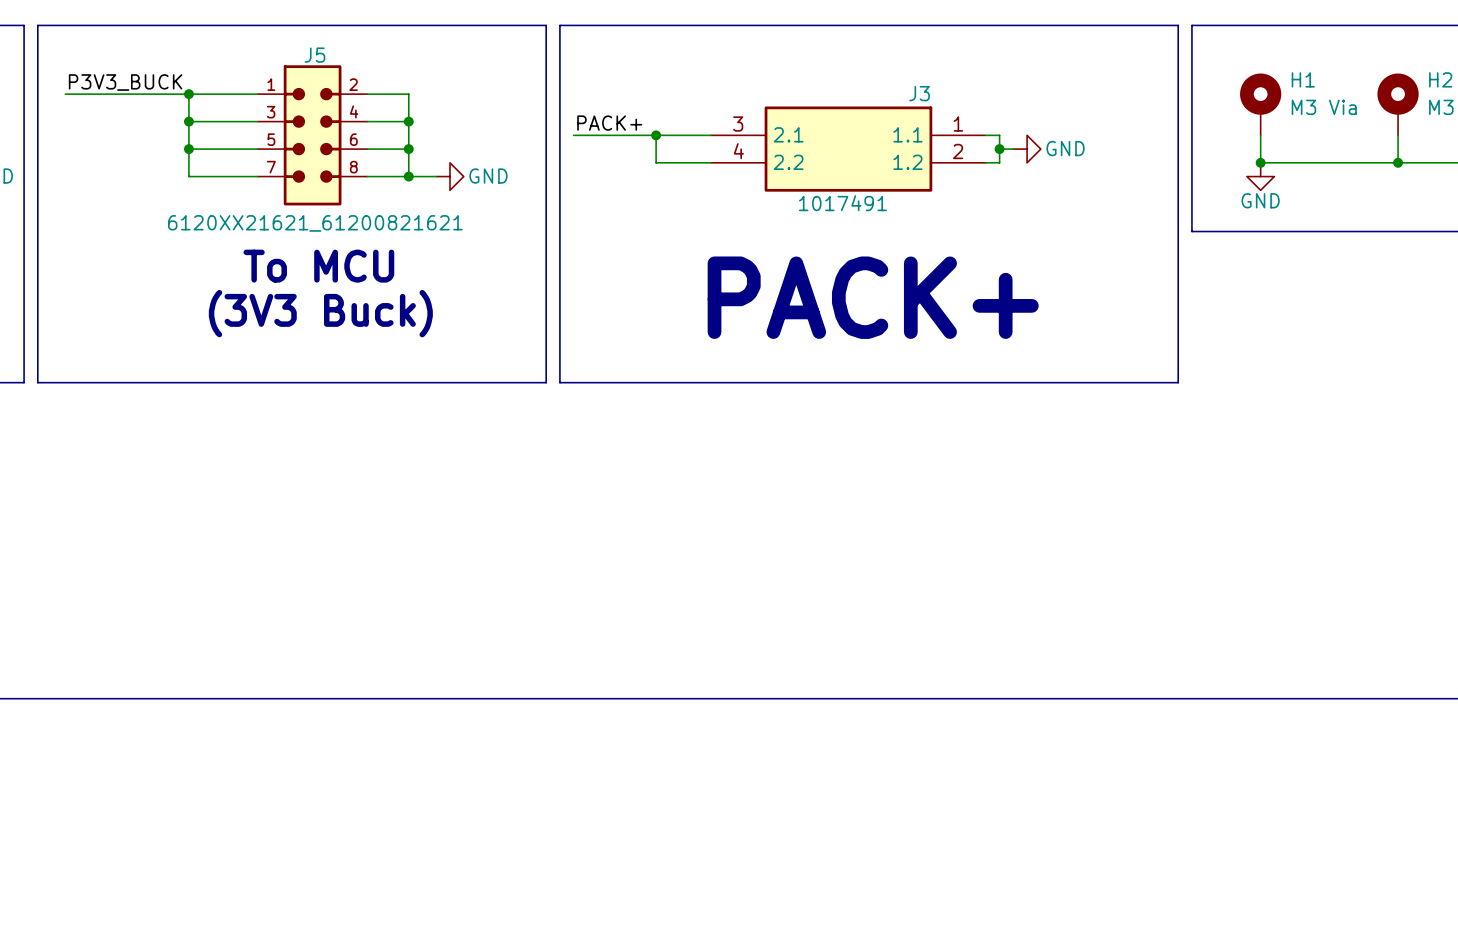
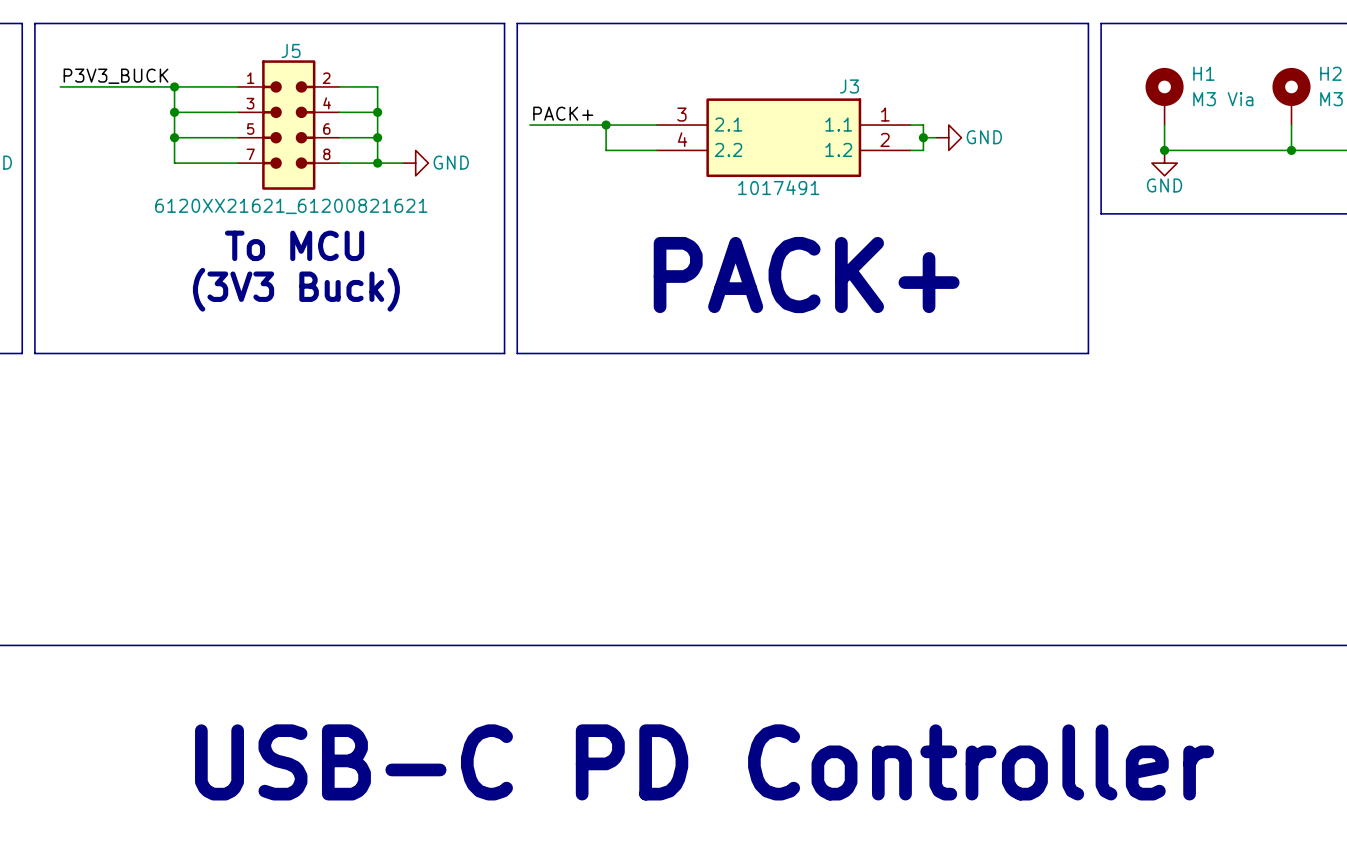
text: none -> USB-C PD Controller (704, 762)

